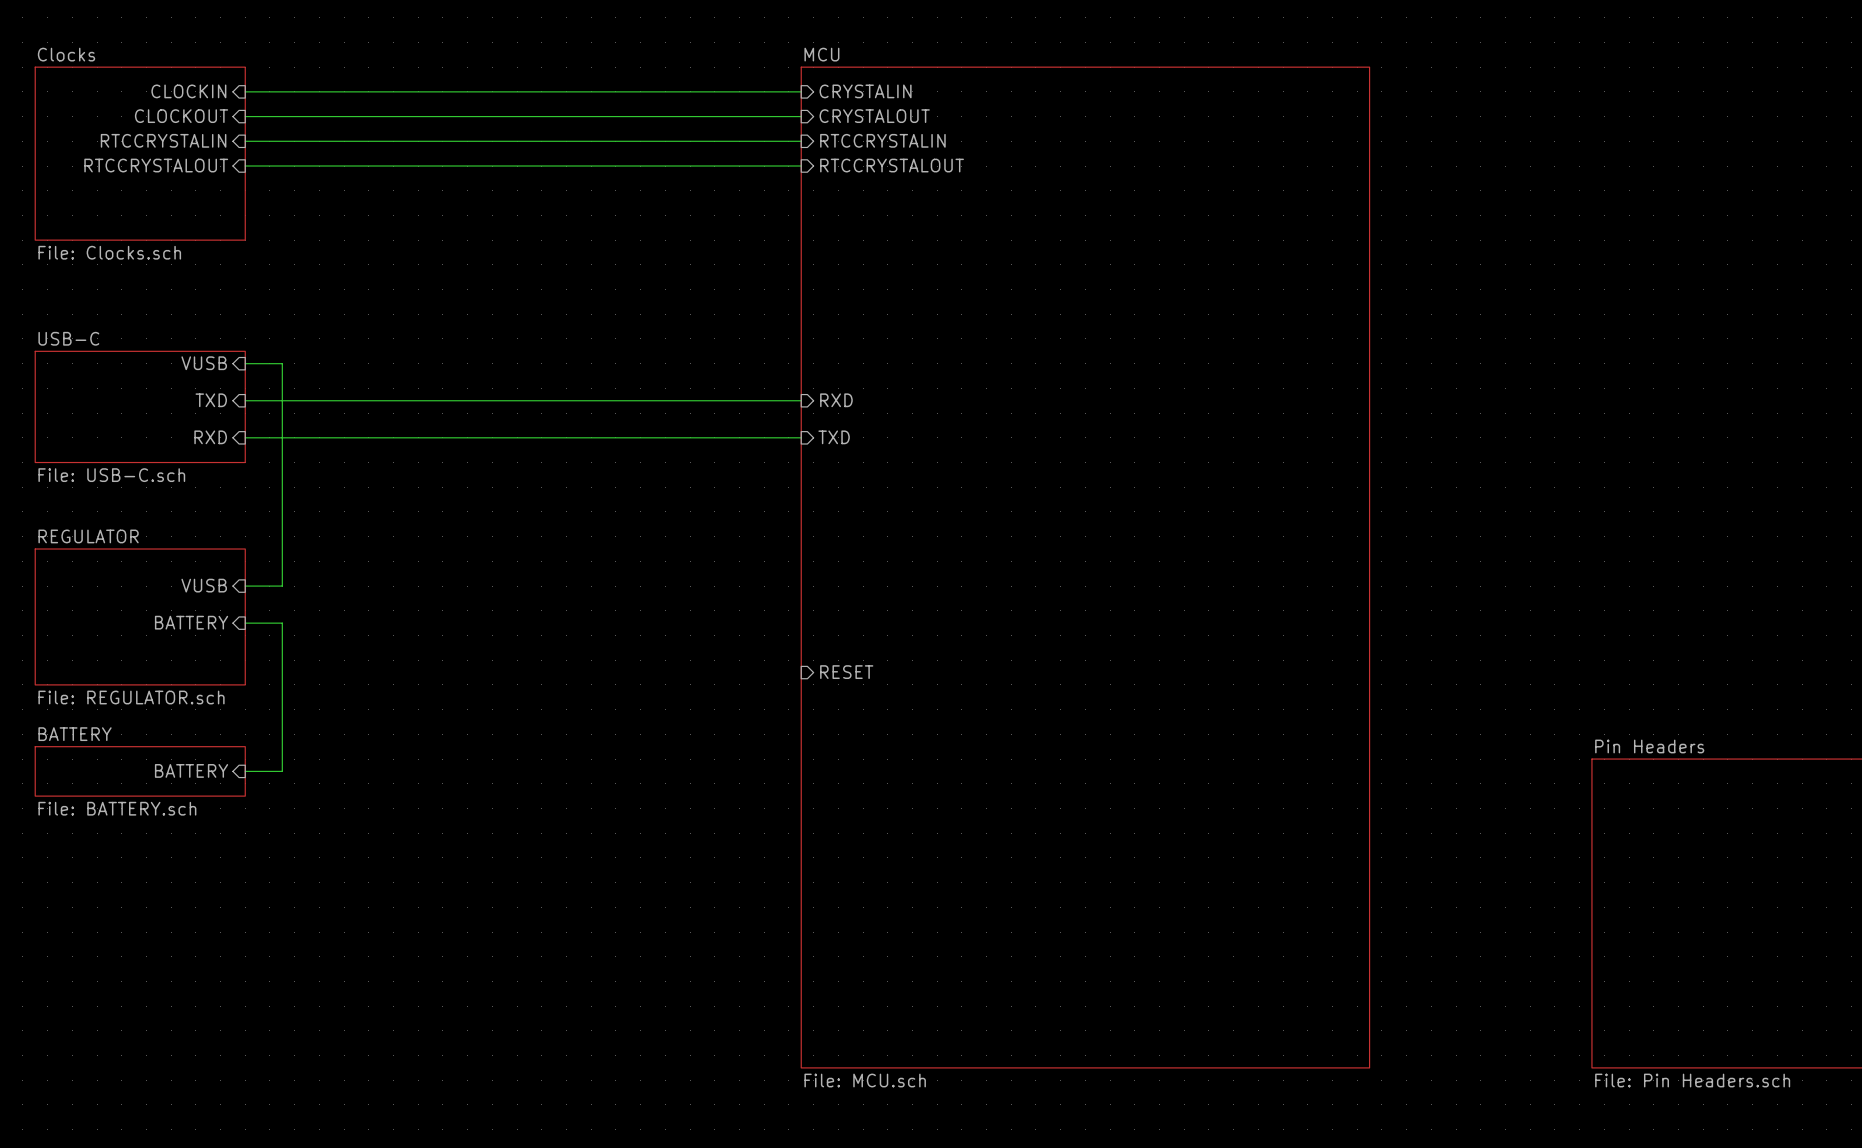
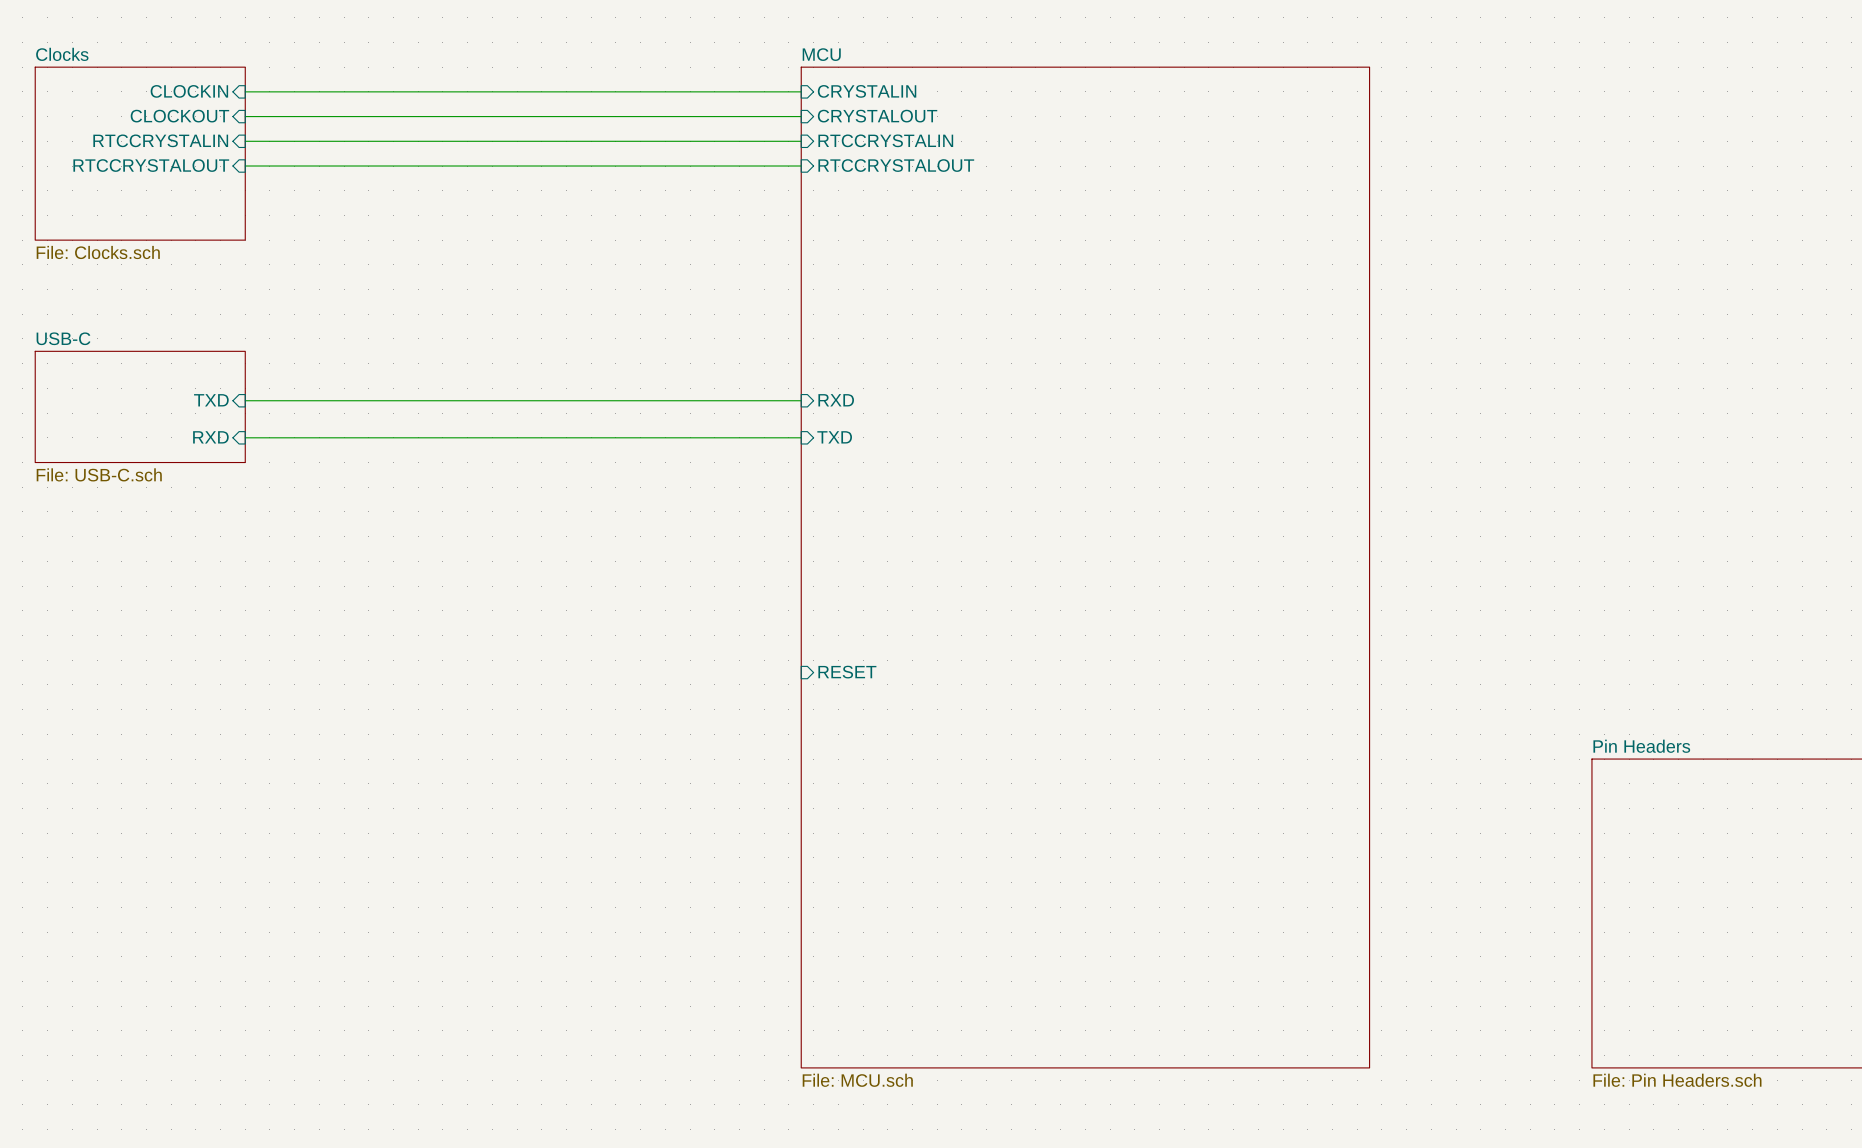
sheet pin: VUSB (204, 363) -> none
wire: (245, 363) (282, 363) (282, 586) (245, 586) -> none
sheet pin: VUSB (204, 585) -> none
sheet REGULATOR: File: REGULATOR.sch (140, 616) -> none
sheet pin: BATTERY (191, 622) -> none
wire: (245, 623) (282, 623) (282, 771) (245, 771) -> none
sheet pin: BATTERY (191, 770) -> none
sheet BATTERY: File: BATTERY.sch (140, 771) -> none

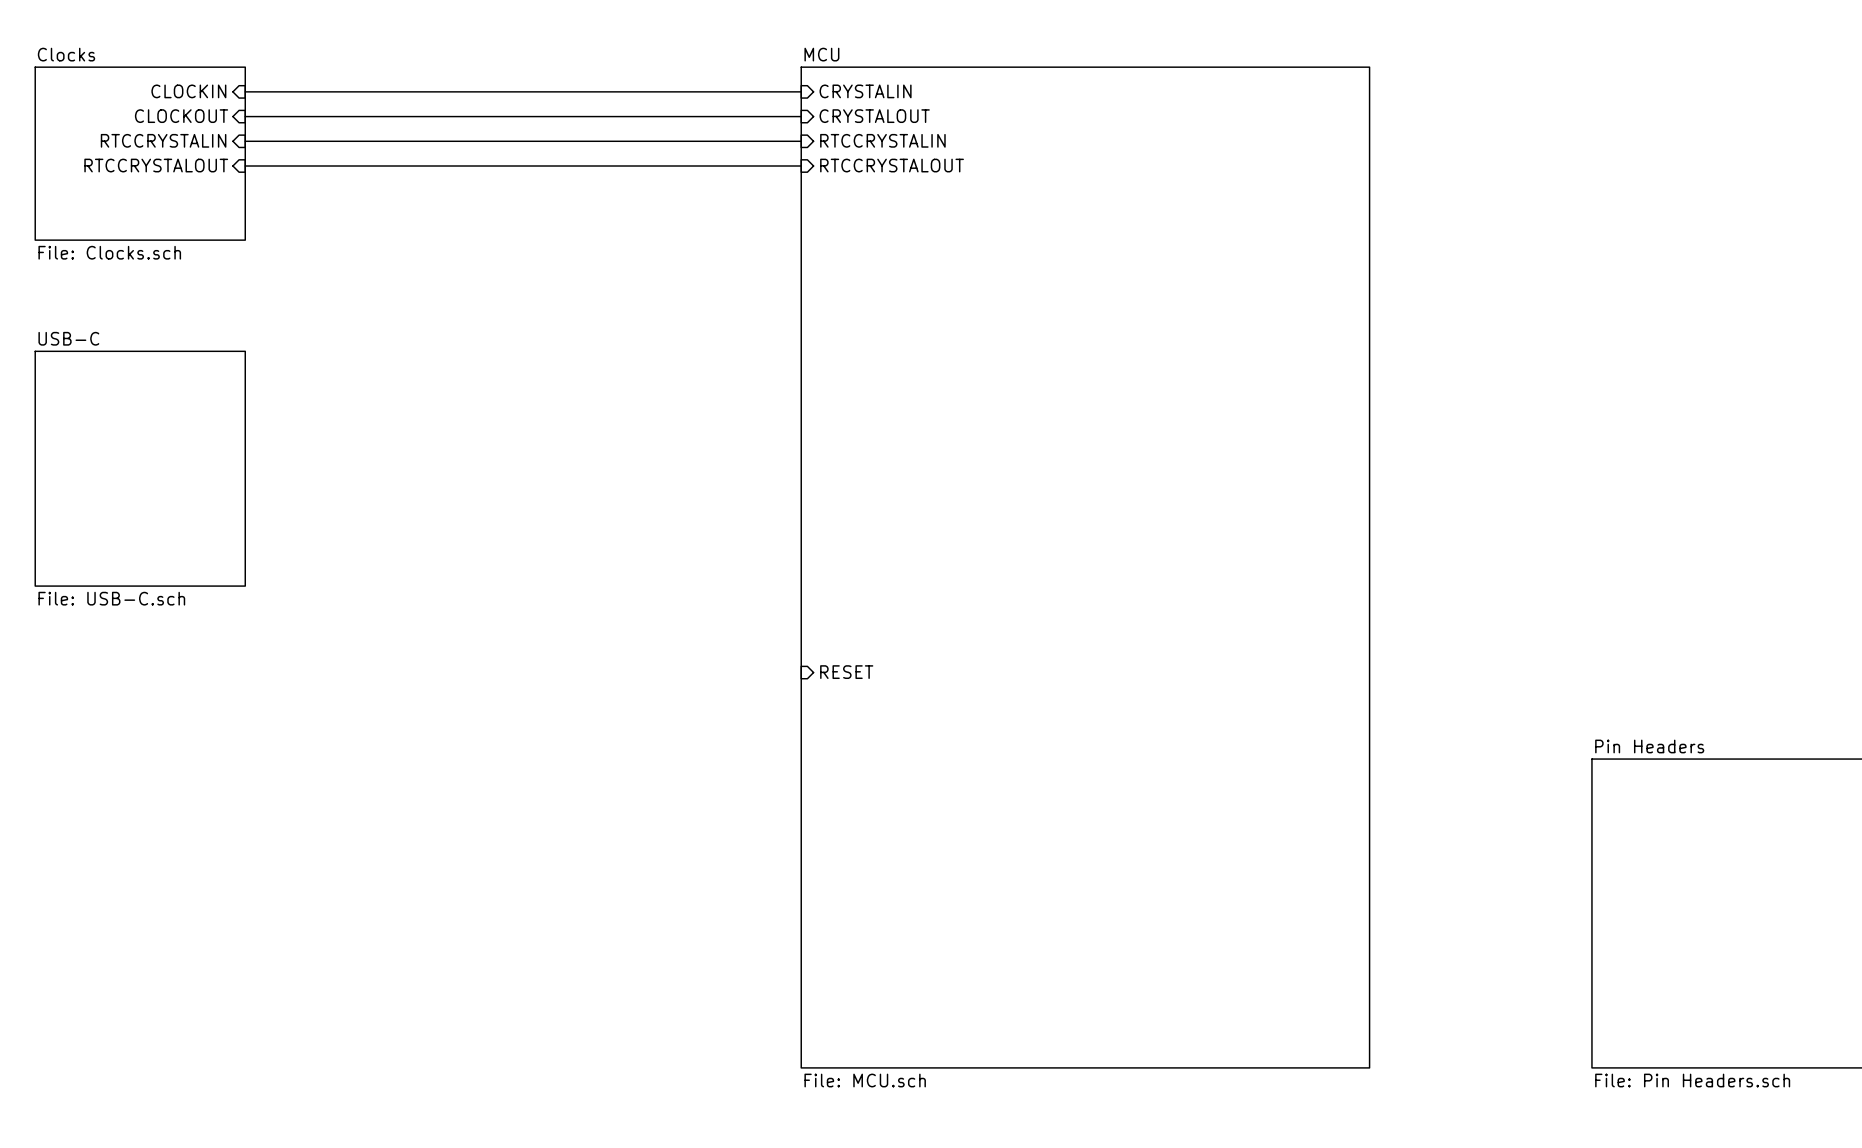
sheet pin: TXD (211, 400) -> none
wire: (245, 400) (801, 400) -> none
sheet pin: RXD (836, 400) -> none
sheet USB-C: File: USB-C.sch (140, 406) -> none
sheet pin: RXD (210, 437) -> none
wire: (245, 437) (801, 437) -> none
sheet pin: TXD (834, 437) -> none
sheet USB-C: none -> File: USB-C.sch (140, 468)

